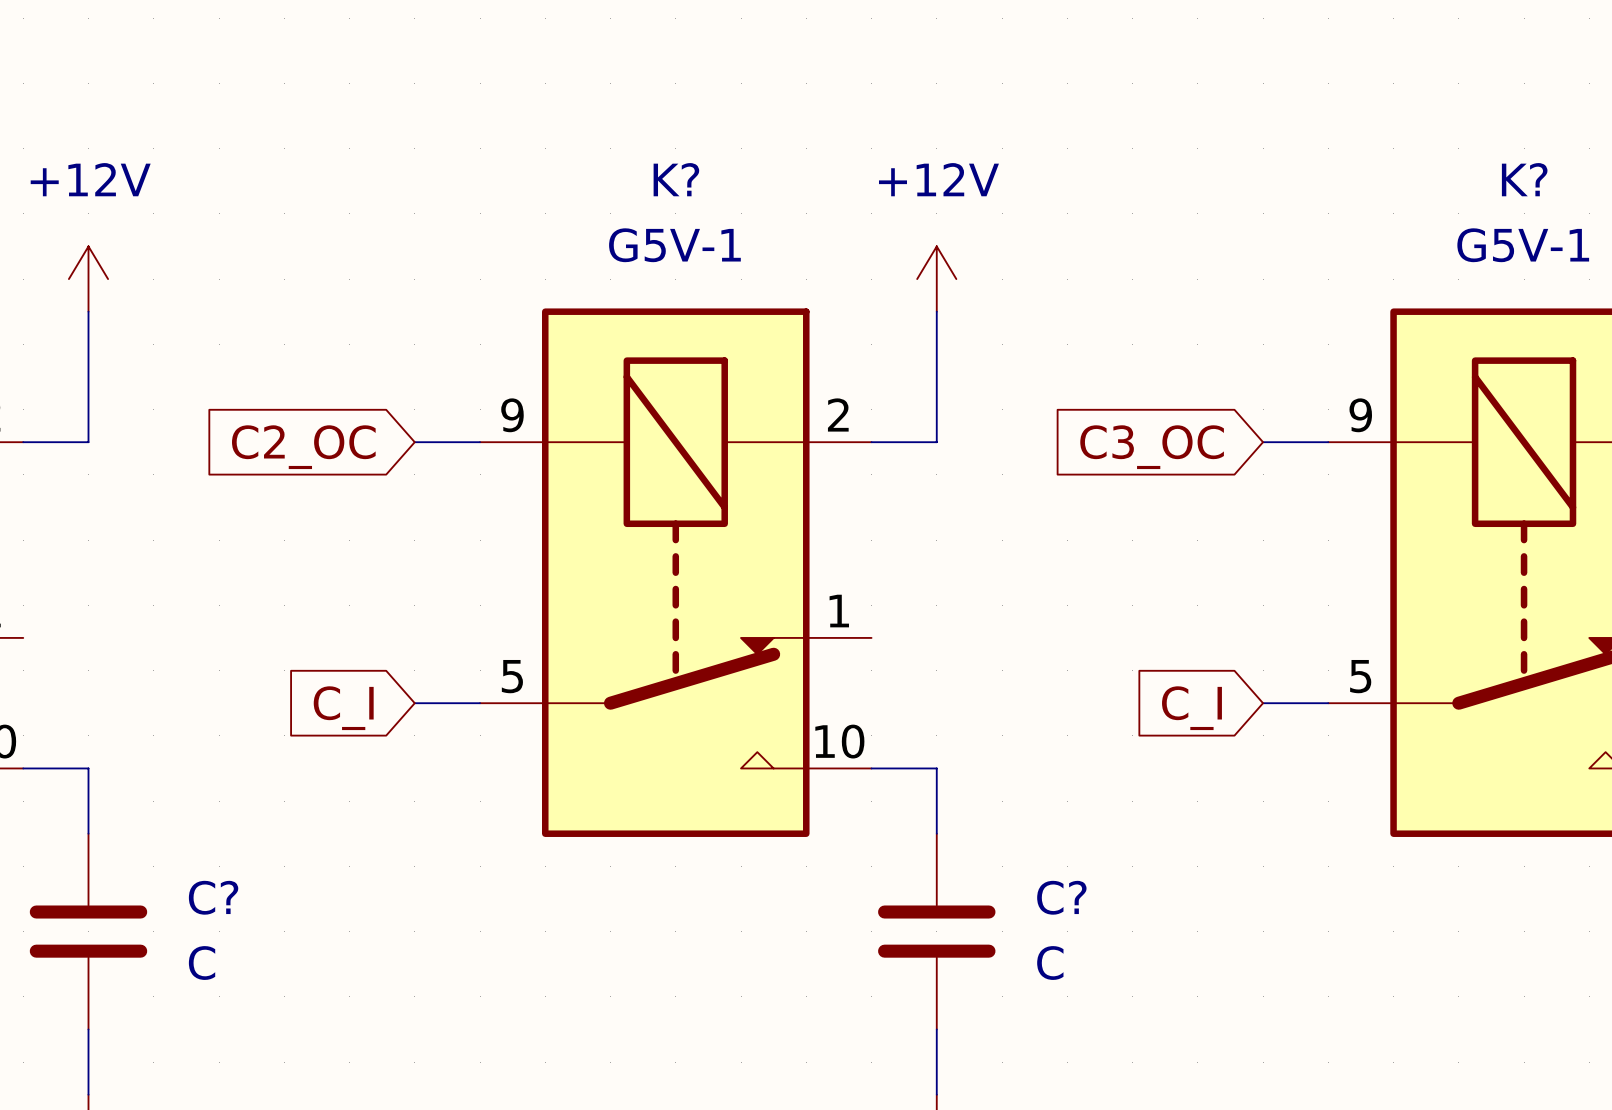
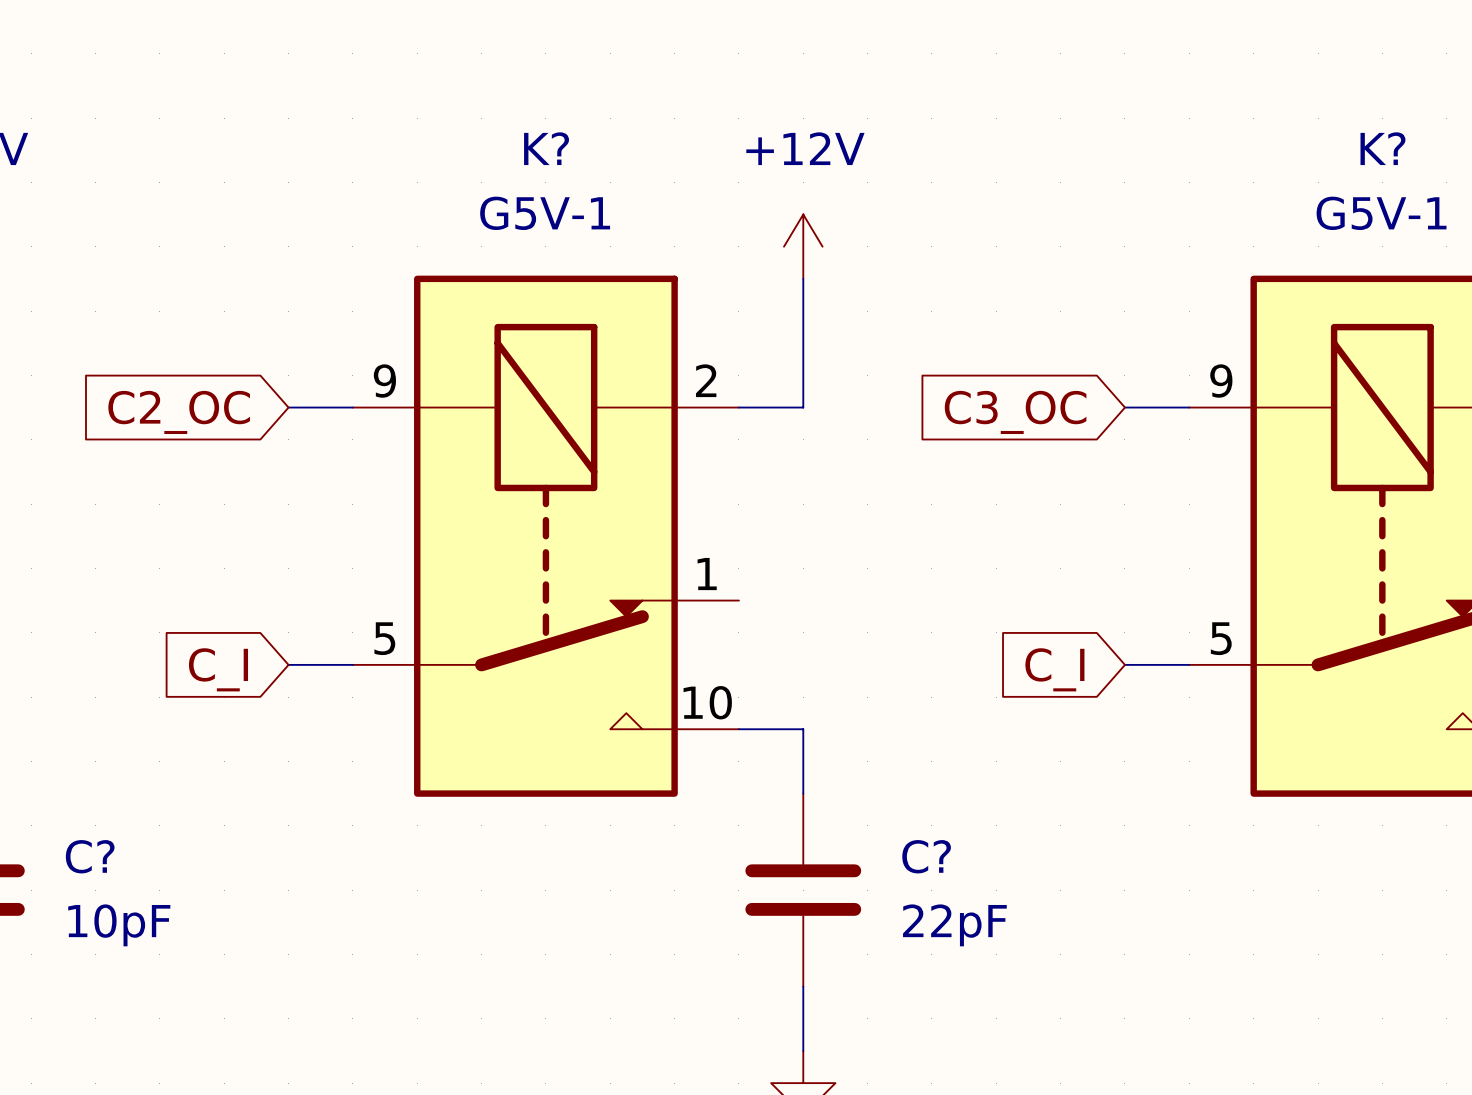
C? value: C (202, 963) -> 10pF (119, 925)
C? value: C (1050, 963) -> 22pF (954, 925)

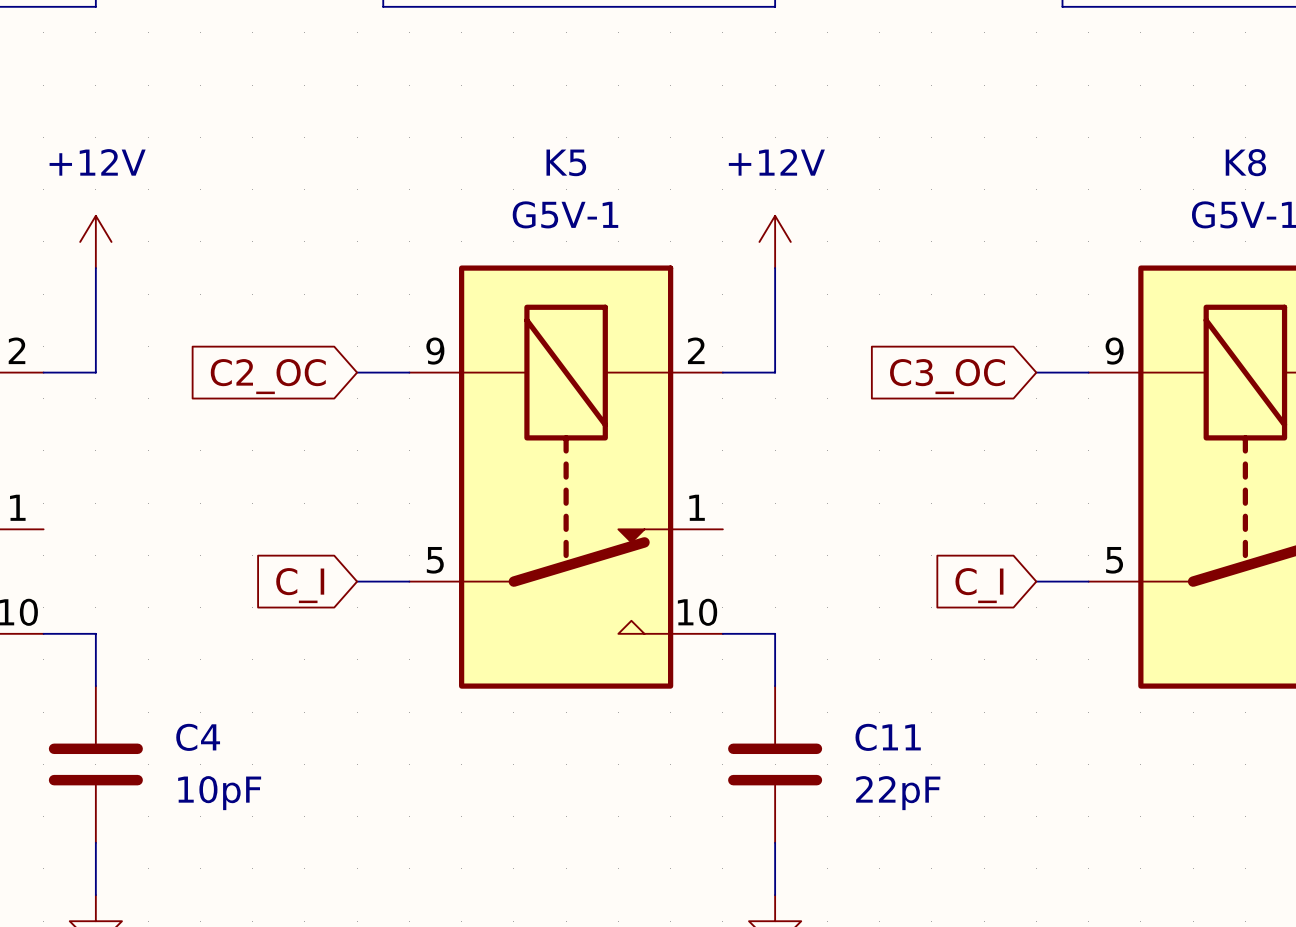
K? name: K? (546, 148) -> K5 (566, 162)
K? name: K? (1382, 148) -> K8 (1245, 162)
C? name: C? (90, 856) -> C4 (198, 737)
C? name: C? (926, 856) -> C11 (888, 737)

